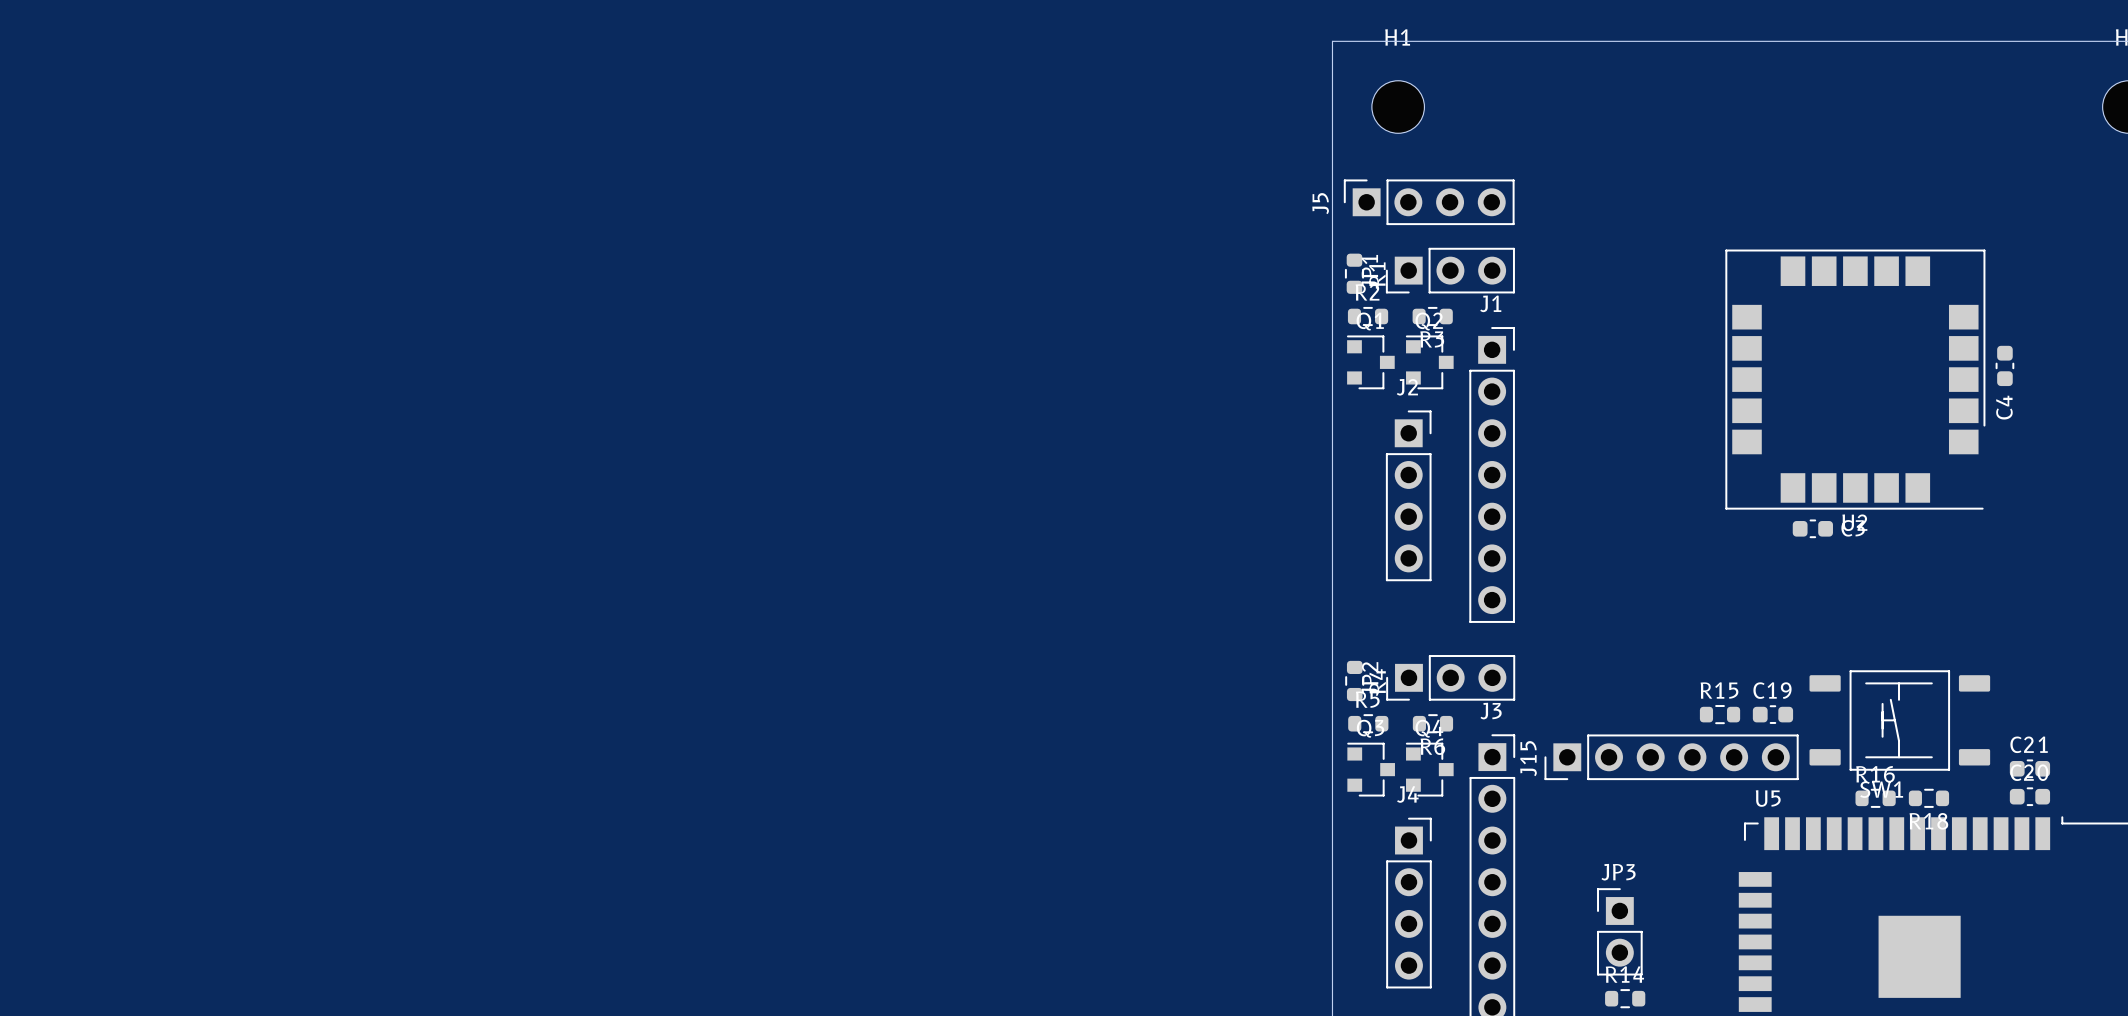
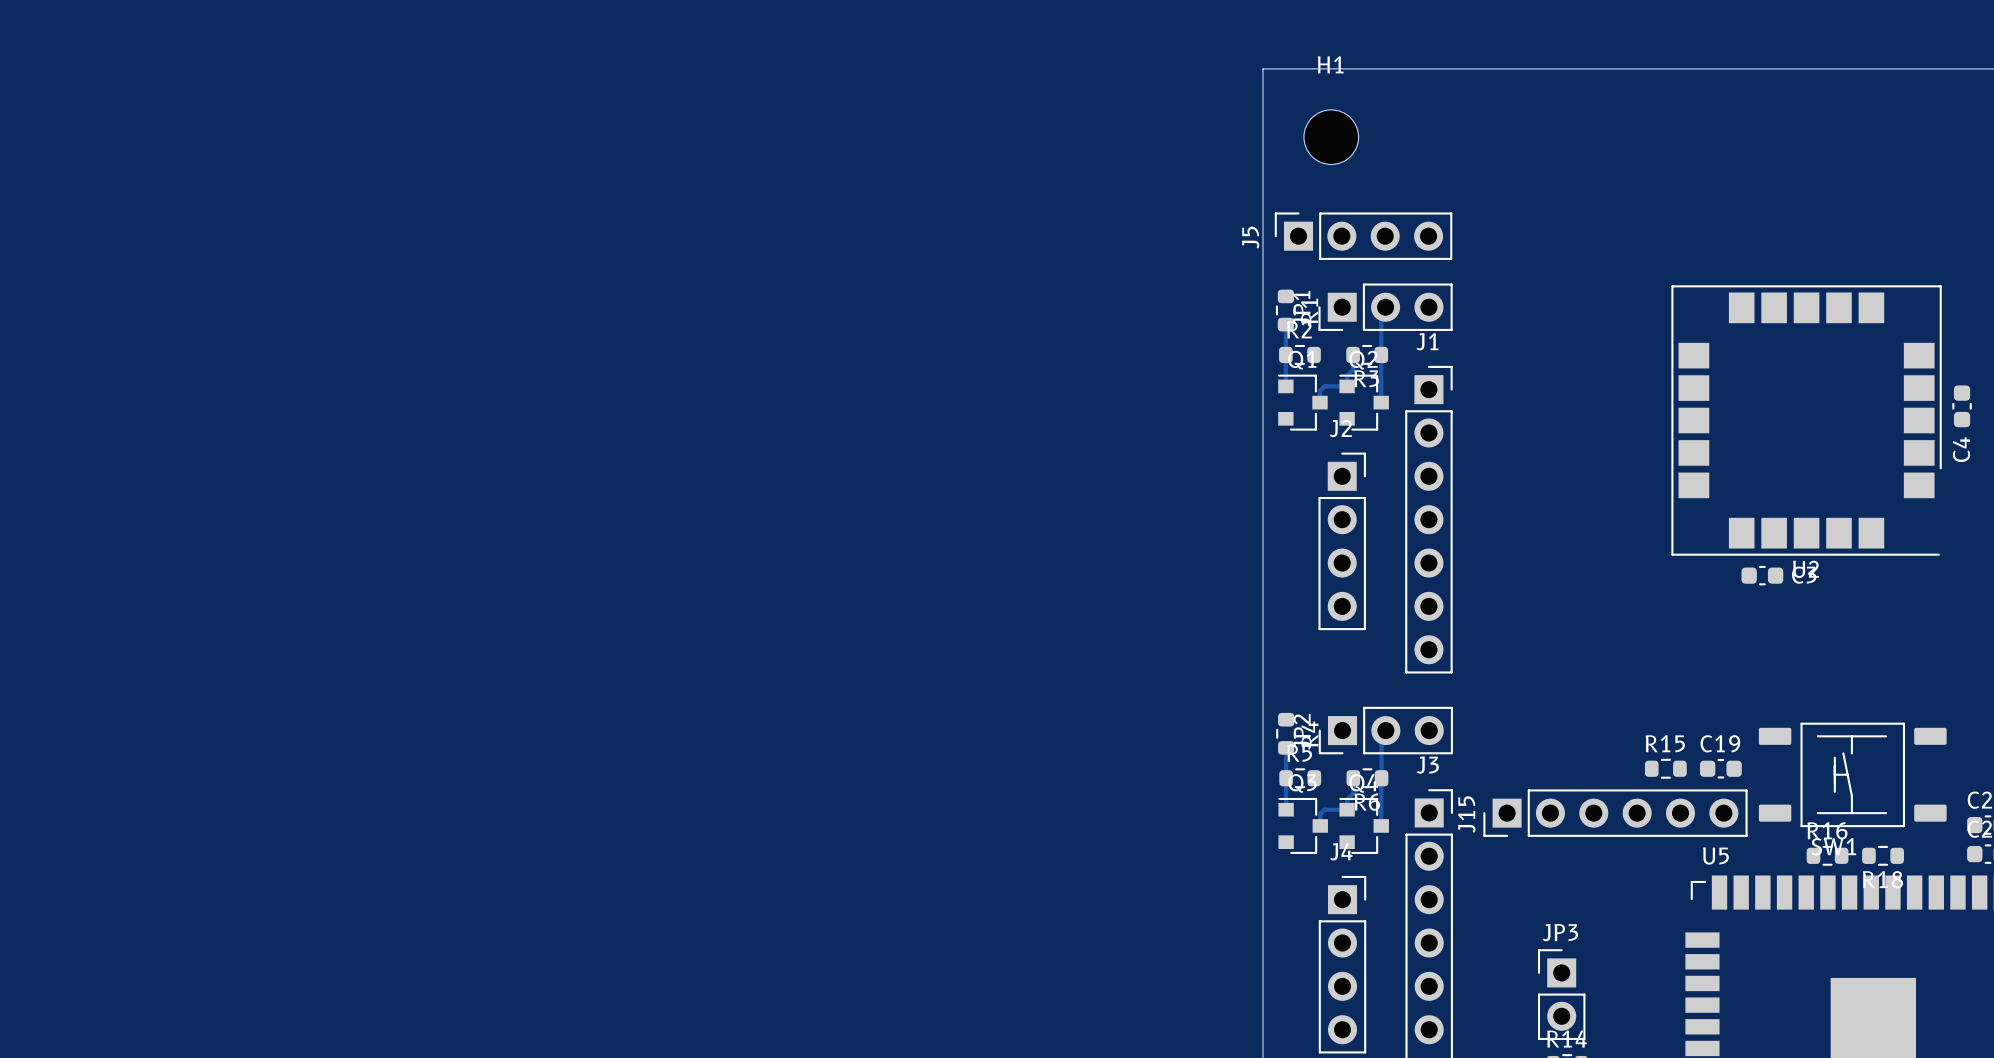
track: none -> (1385, 307) (1381, 311) (1381, 402)
track: none -> (1285, 324) (1285, 386)
track: none -> (1353, 354) (1353, 369) (1347, 375) (1347, 386) (1324, 386) (1320, 390) (1320, 402)
track: none -> (1385, 730) (1381, 734) (1381, 825)
track: none -> (1286, 747) (1286, 809)
track: none -> (1353, 778) (1353, 793) (1347, 799) (1347, 809) (1324, 809) (1320, 813) (1320, 825)

